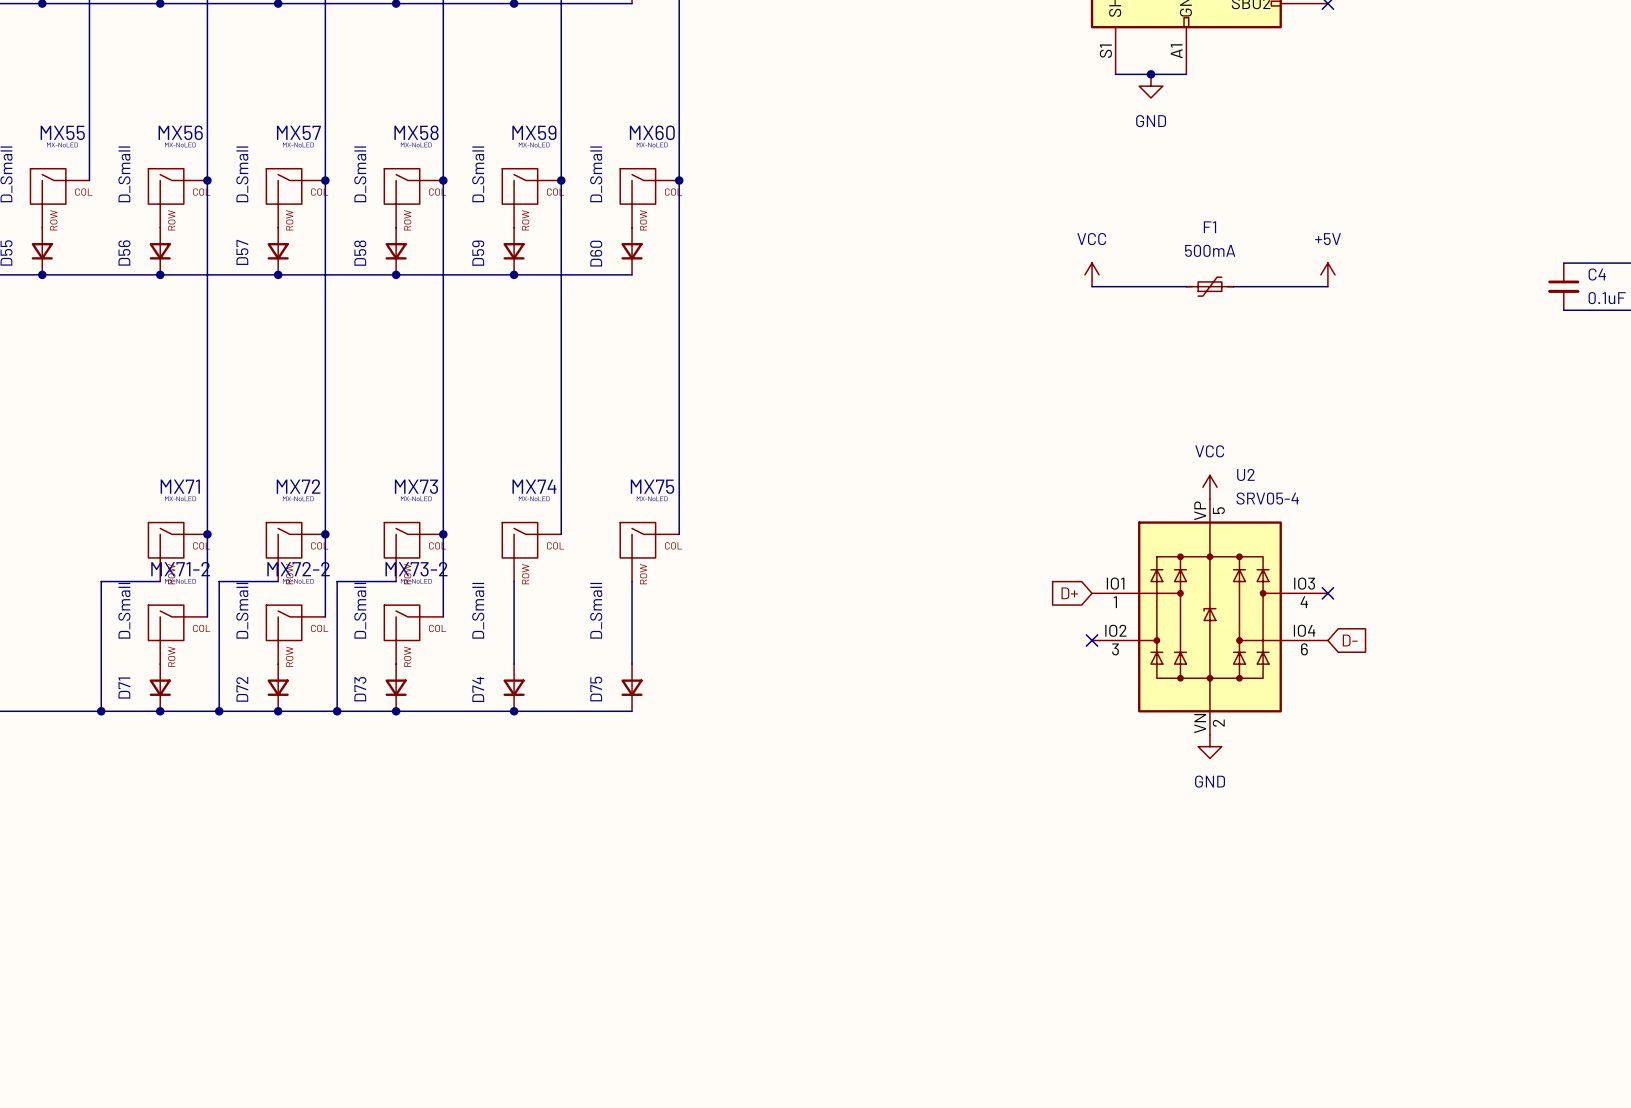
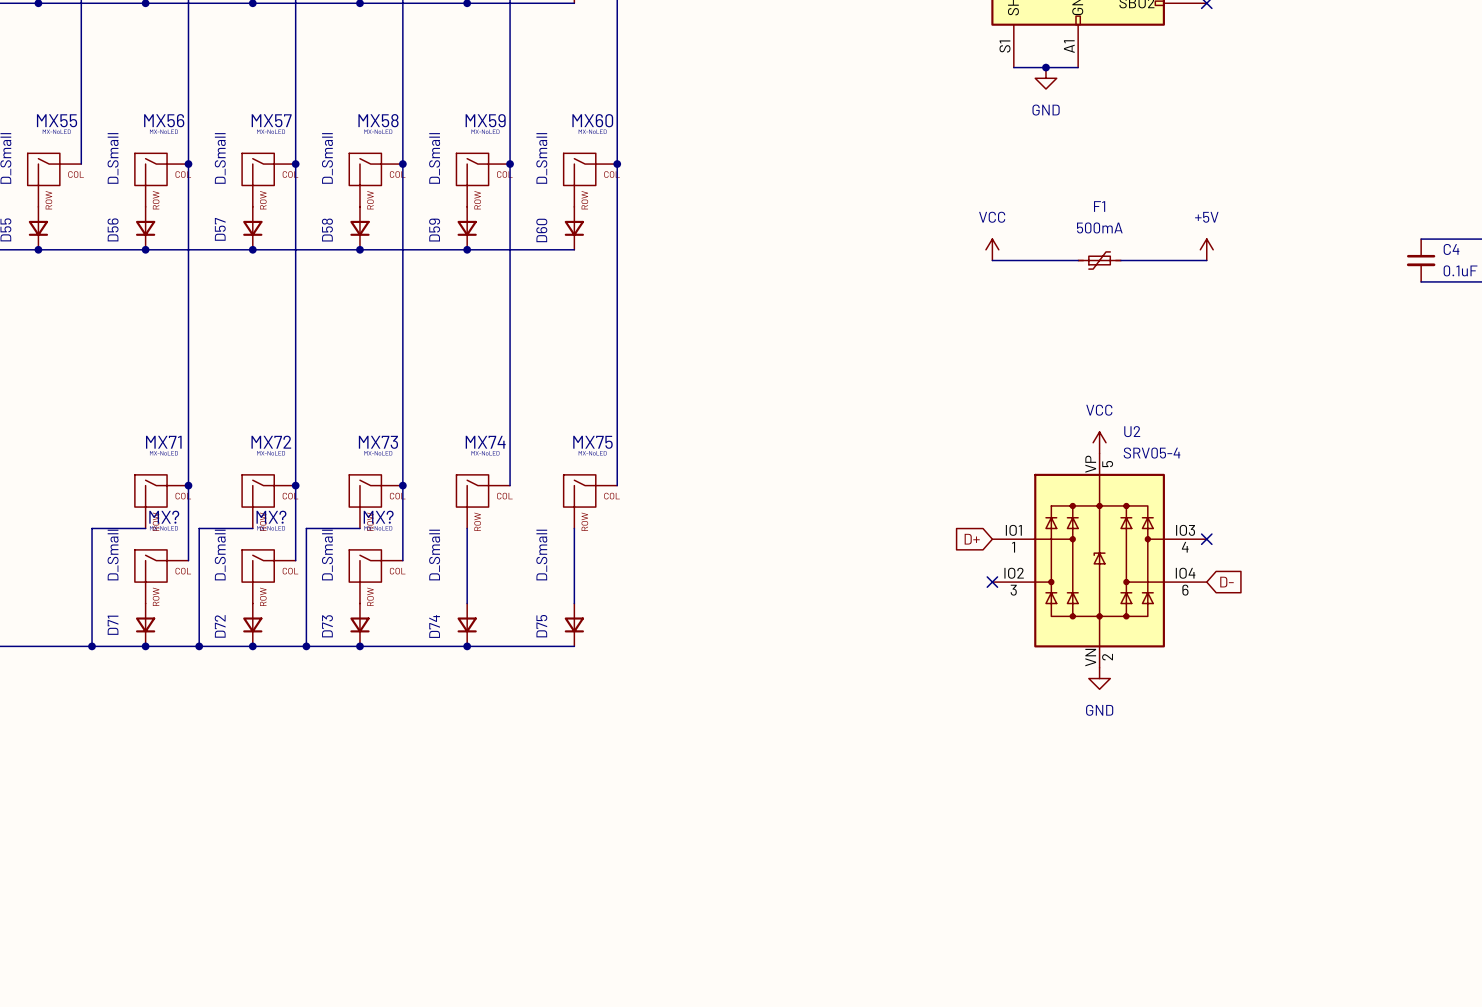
MX71-2 name: MX71-2 (180, 569) -> MX? (164, 517)
MX72-2 name: MX72-2 (298, 569) -> MX? (271, 517)
MX73-2 name: MX73-2 (416, 569) -> MX? (378, 517)

